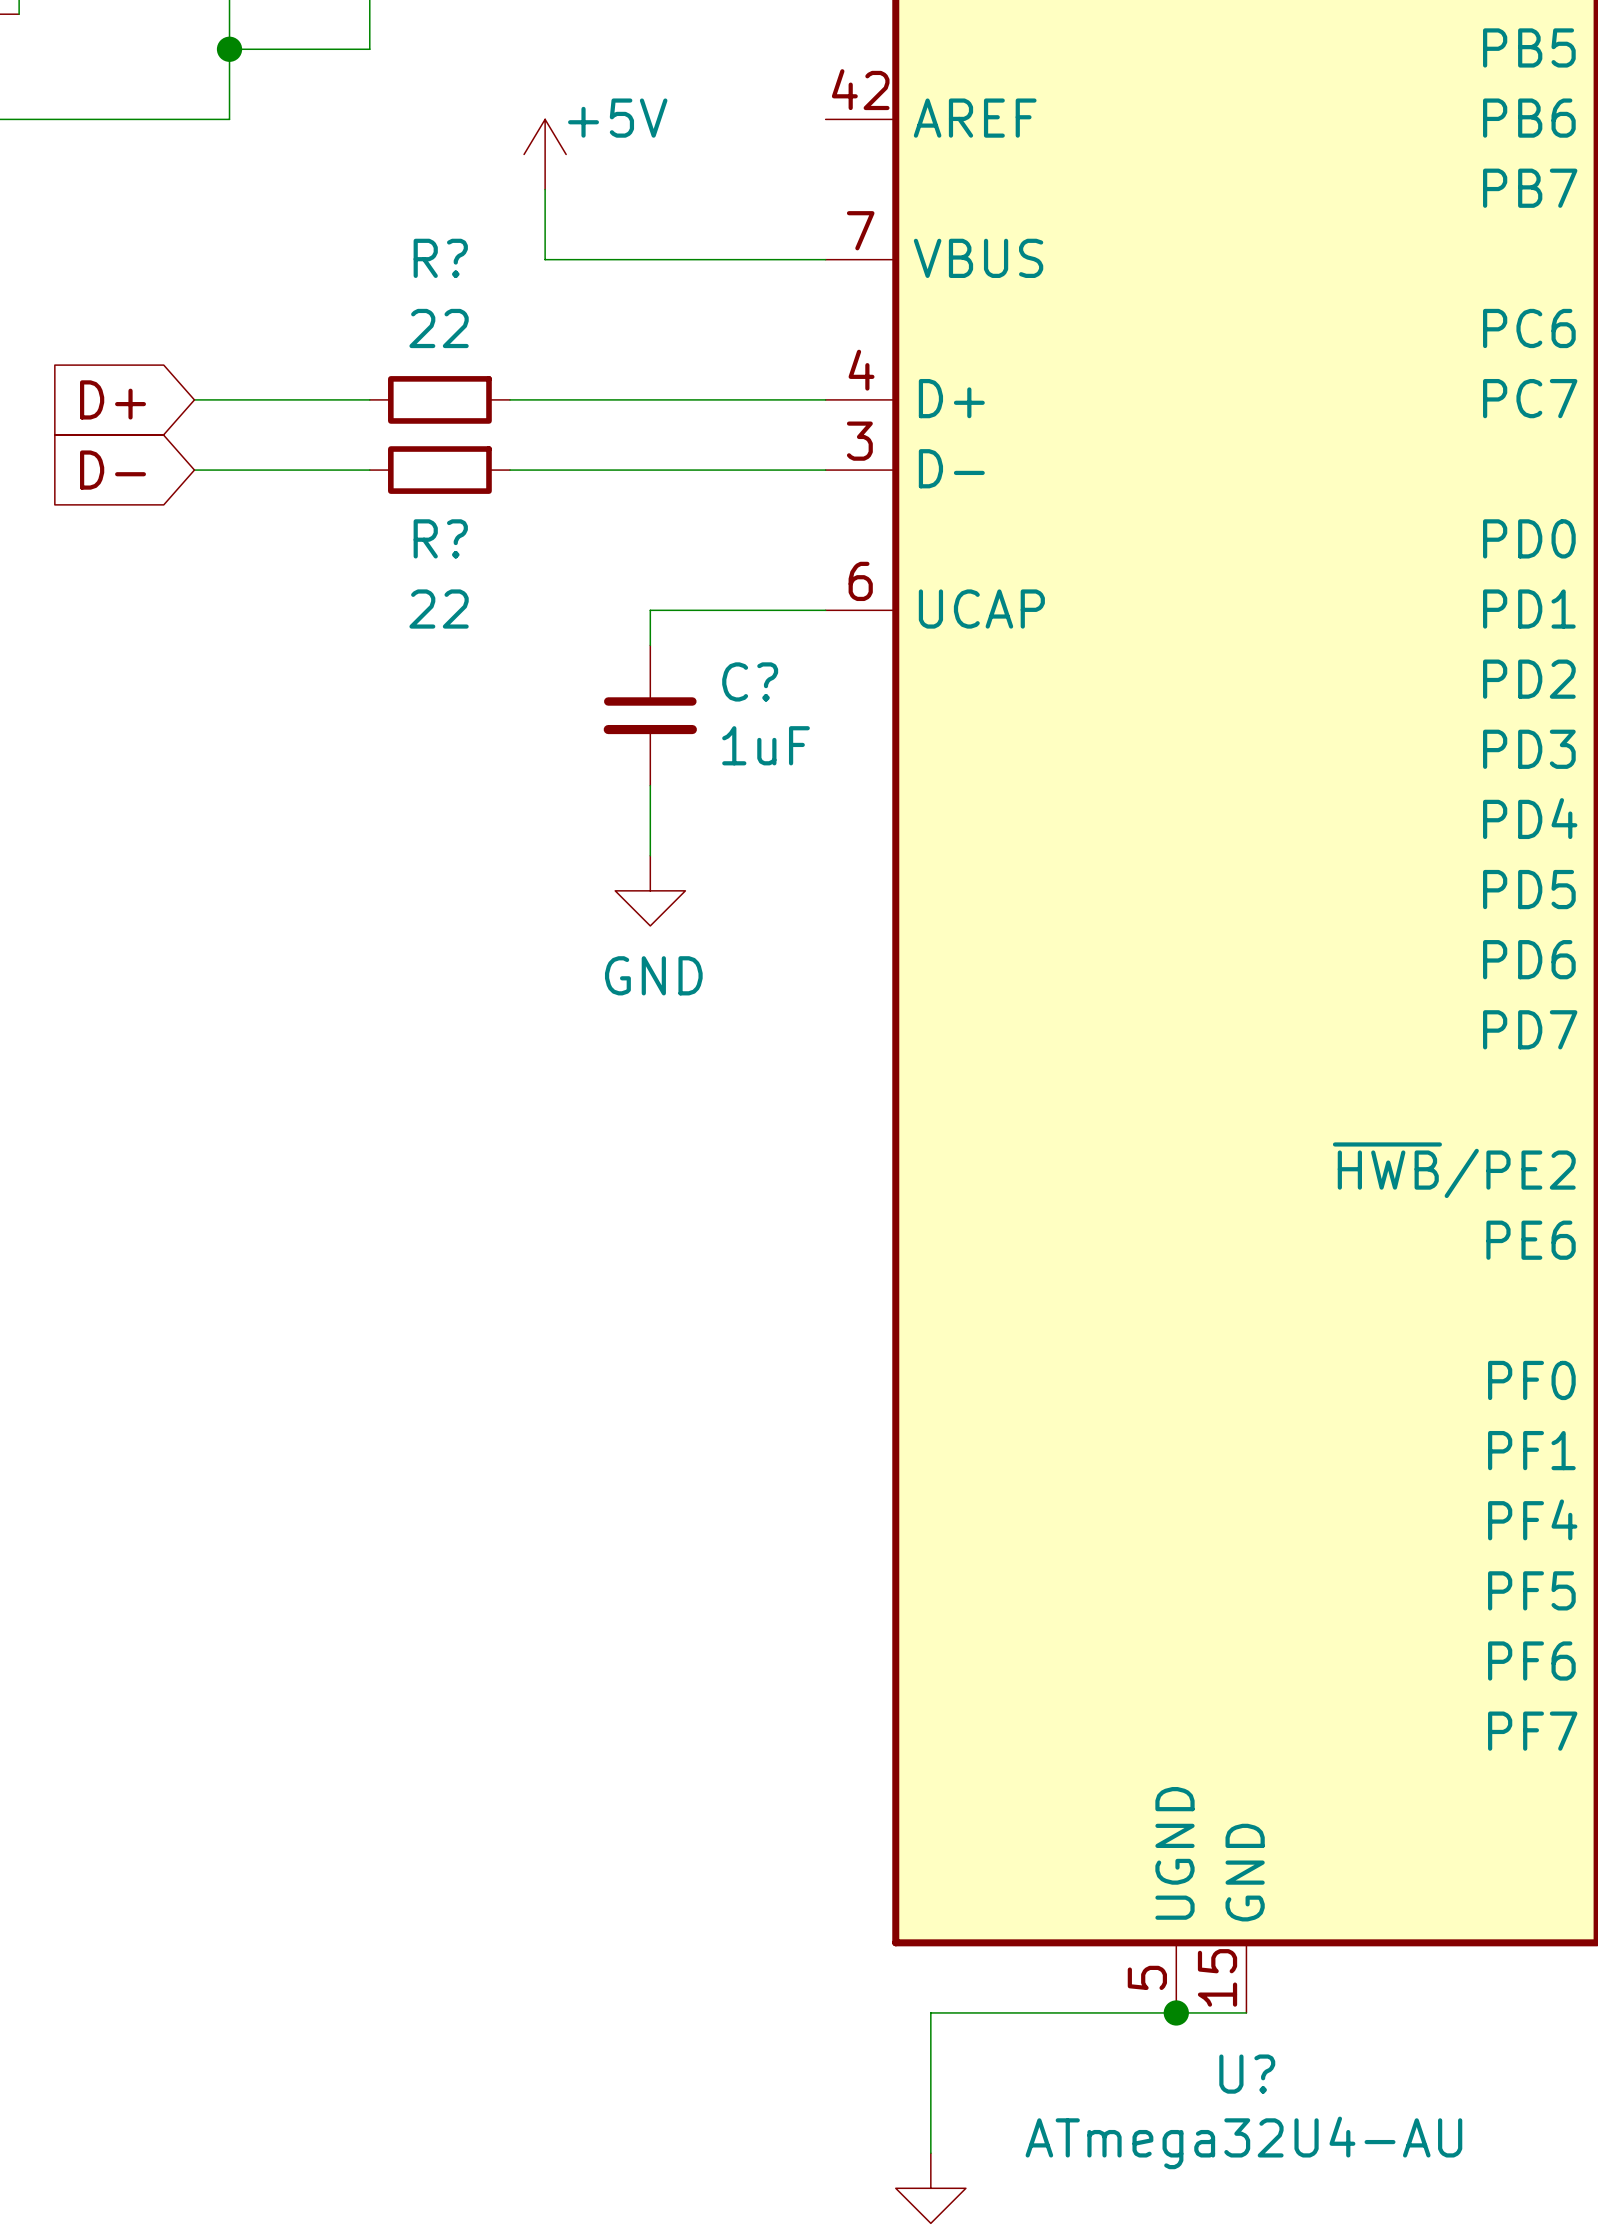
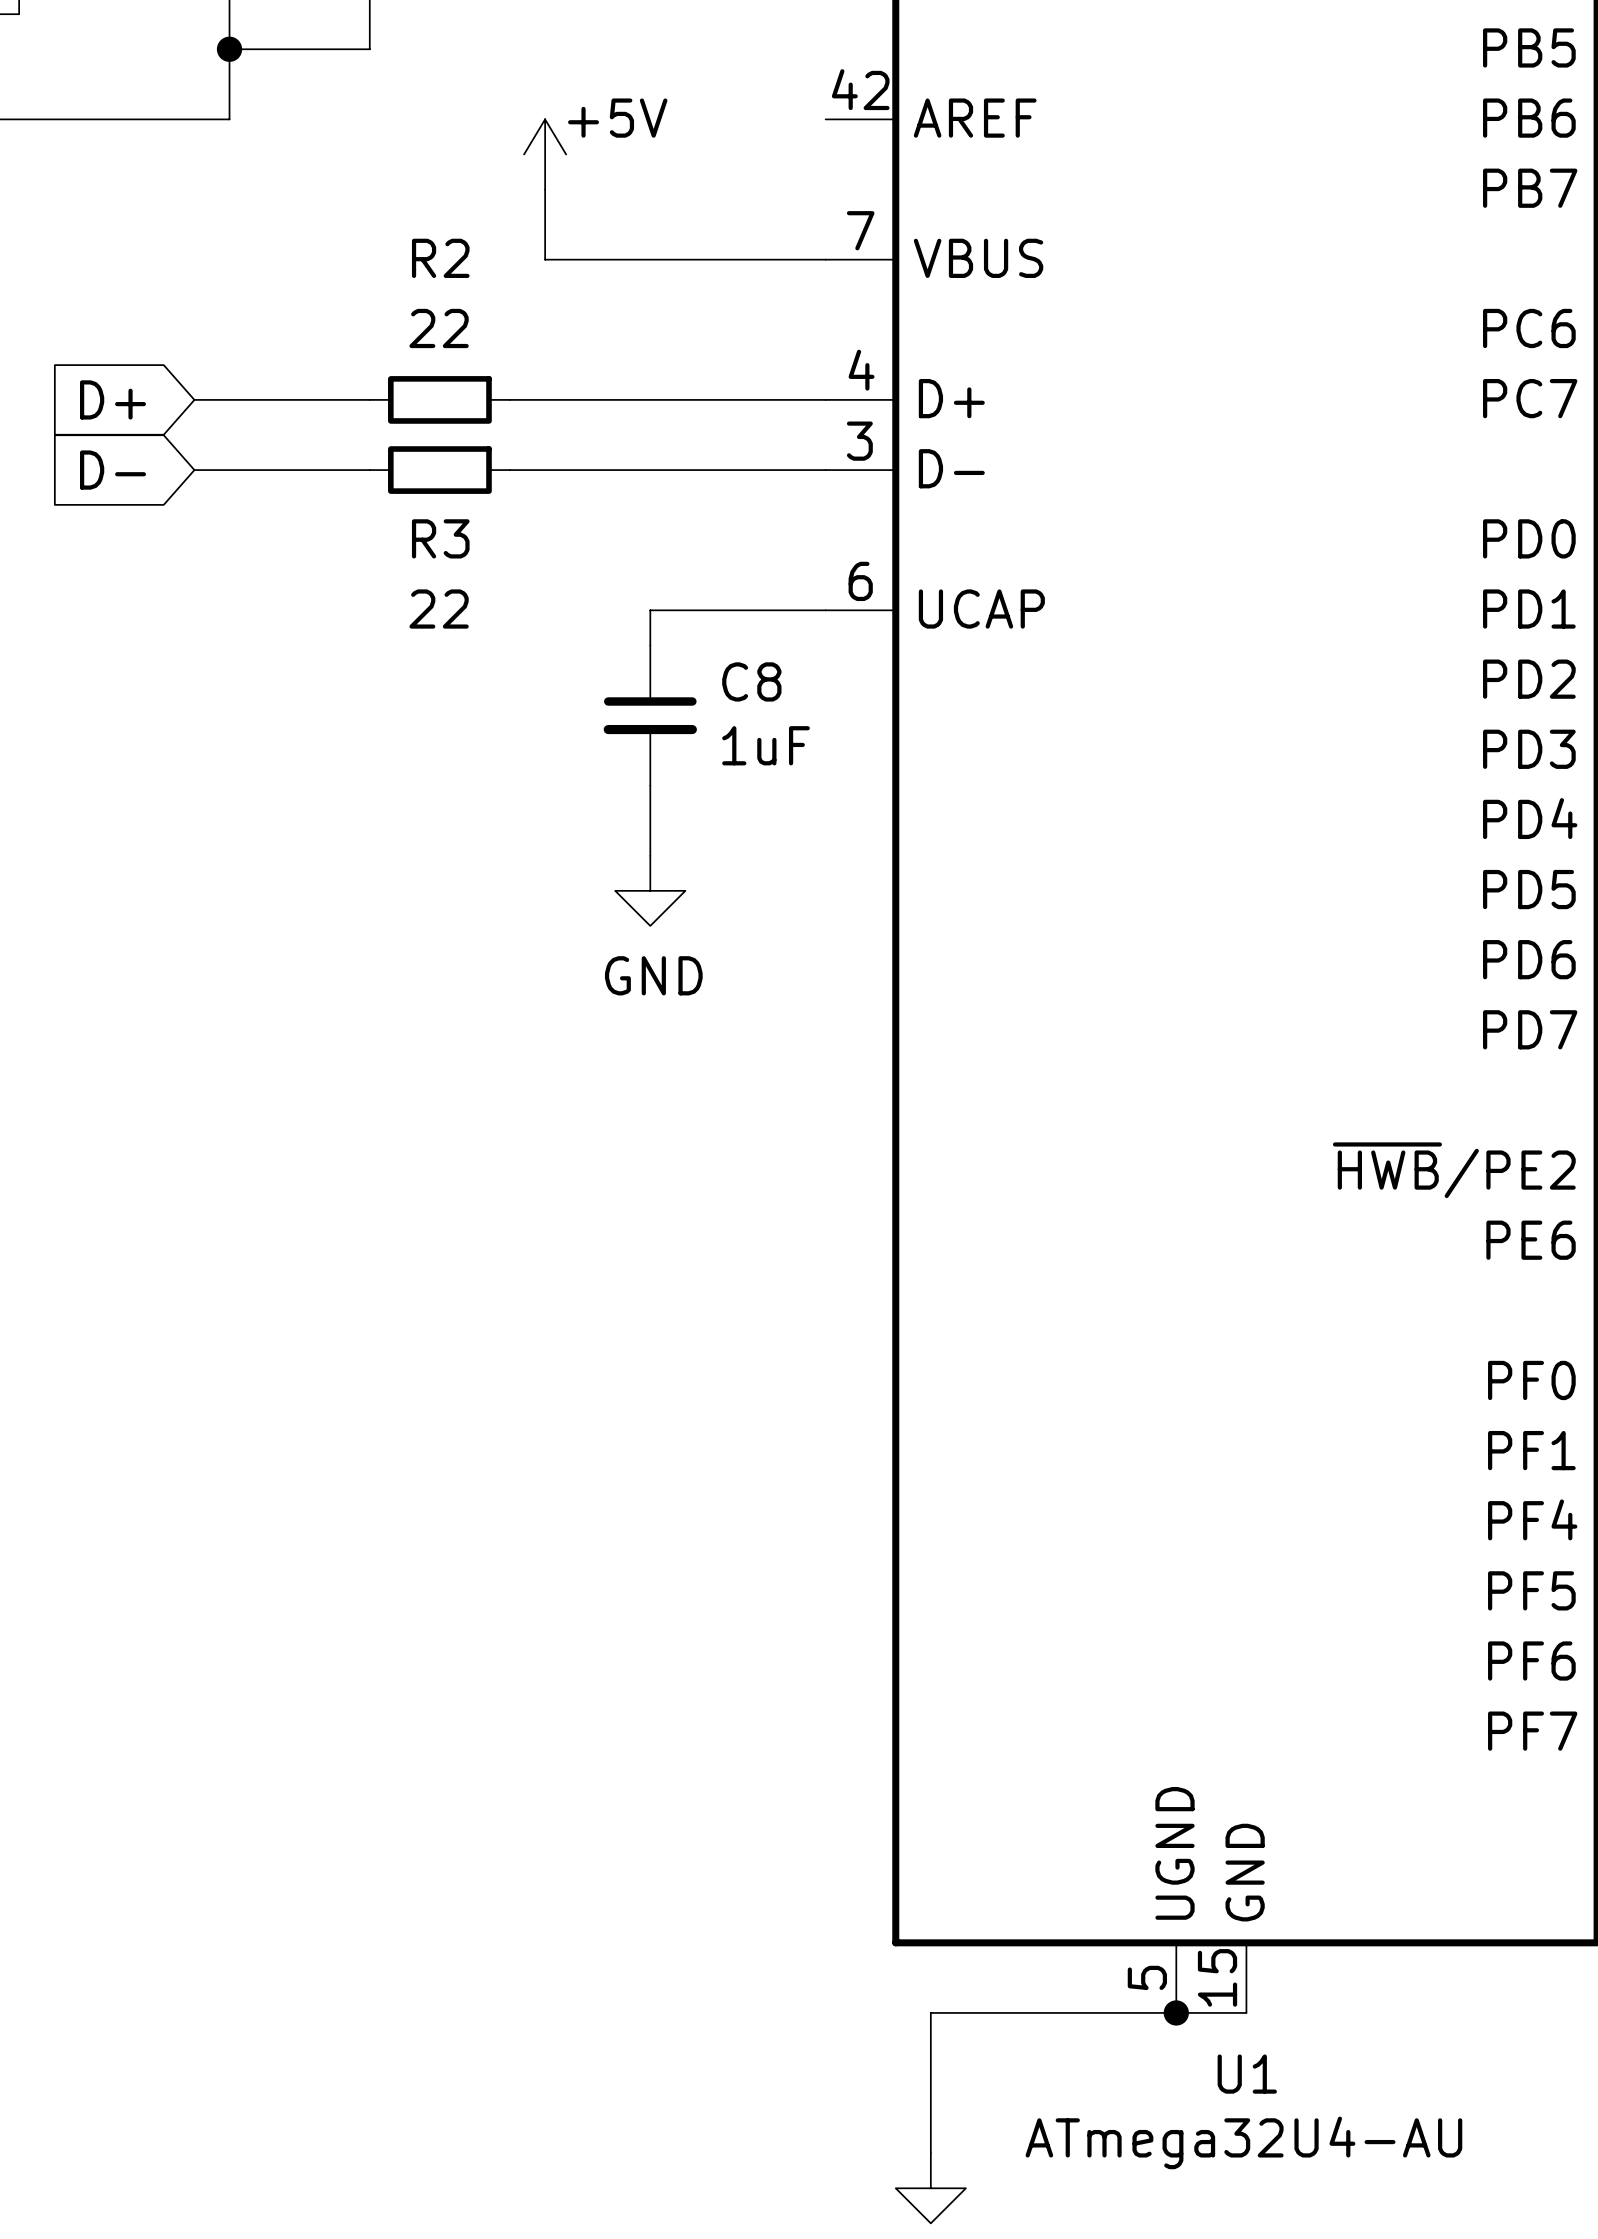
R? name: R? (440, 258) -> R2 (440, 258)
R? name: R? (440, 538) -> R3 (440, 538)
C? name: C? (750, 681) -> C8 (751, 681)
U? name: U? (1247, 2074) -> U1 (1247, 2074)

